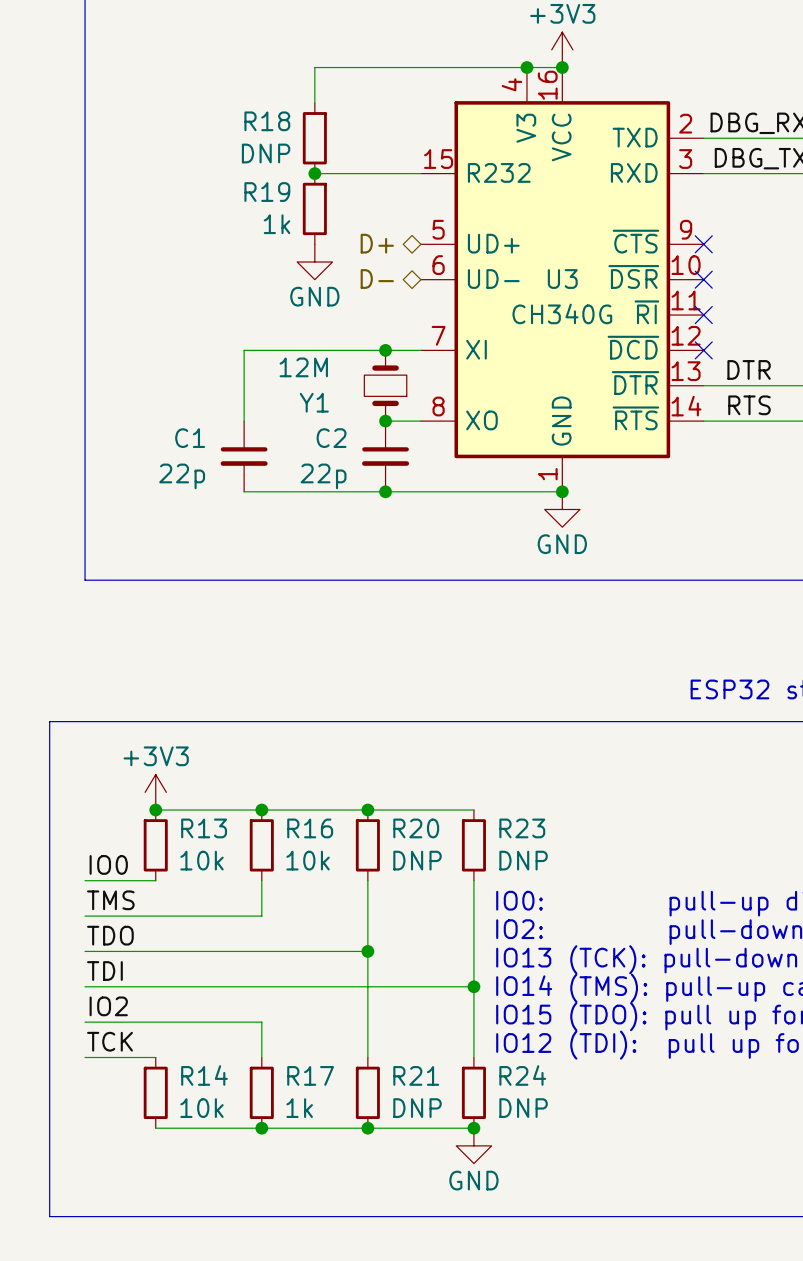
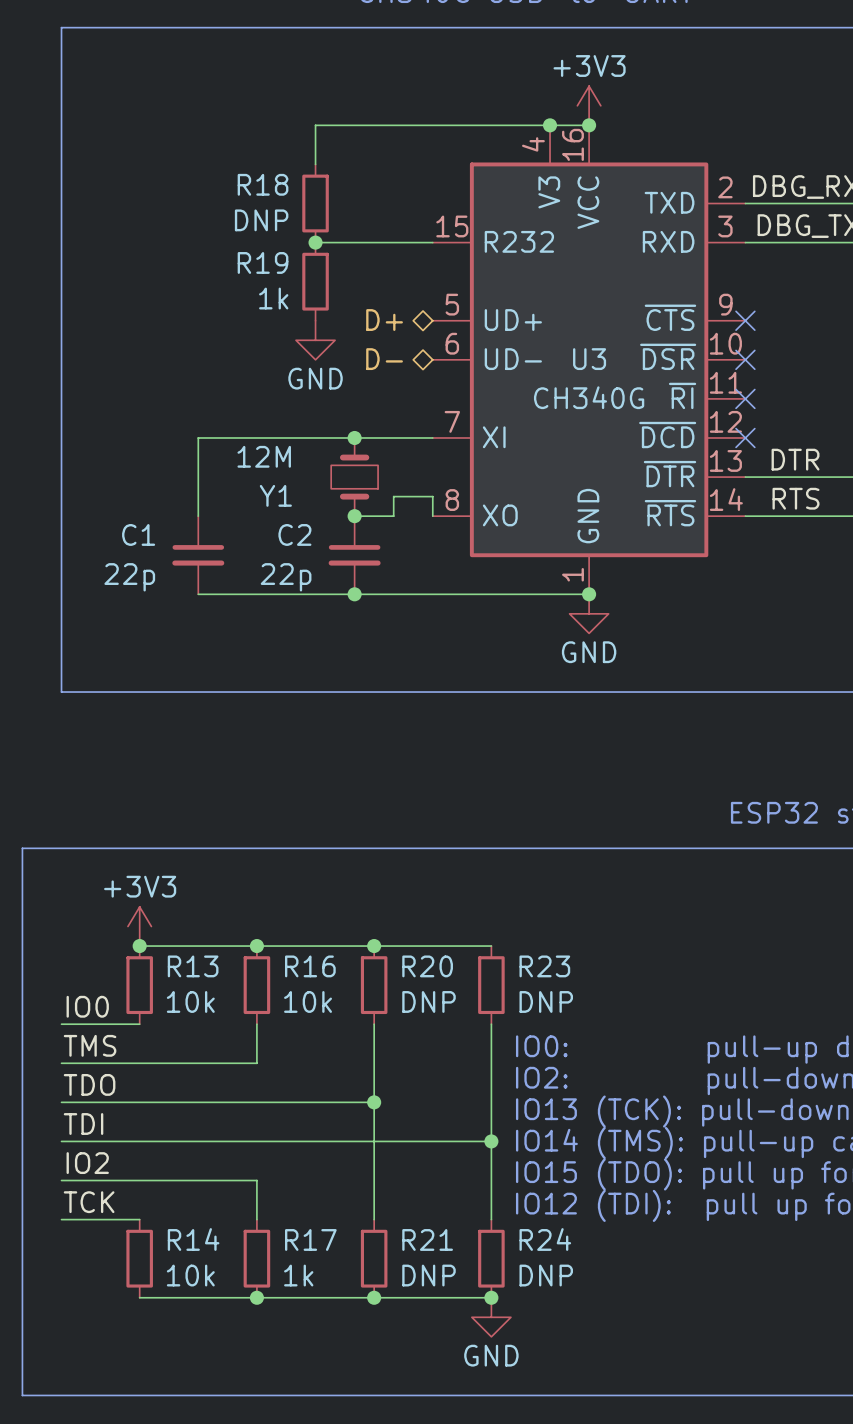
wire: (244, 350) (244, 421) -> (237, 437) (198, 437) (198, 516)
junction position: (385, 350) -> (354, 437)
Y1 position: (385, 385) -> (354, 477)
wire: (385, 421) (420, 421) -> (354, 516) (393, 516) (393, 496) (432, 496) (432, 516)
junction position: (385, 421) -> (354, 516)
C1 position: (244, 456) -> (198, 555)
C2 position: (385, 456) -> (354, 555)
wire: none -> (198, 594) (237, 594)
junction position: (385, 491) -> (354, 594)

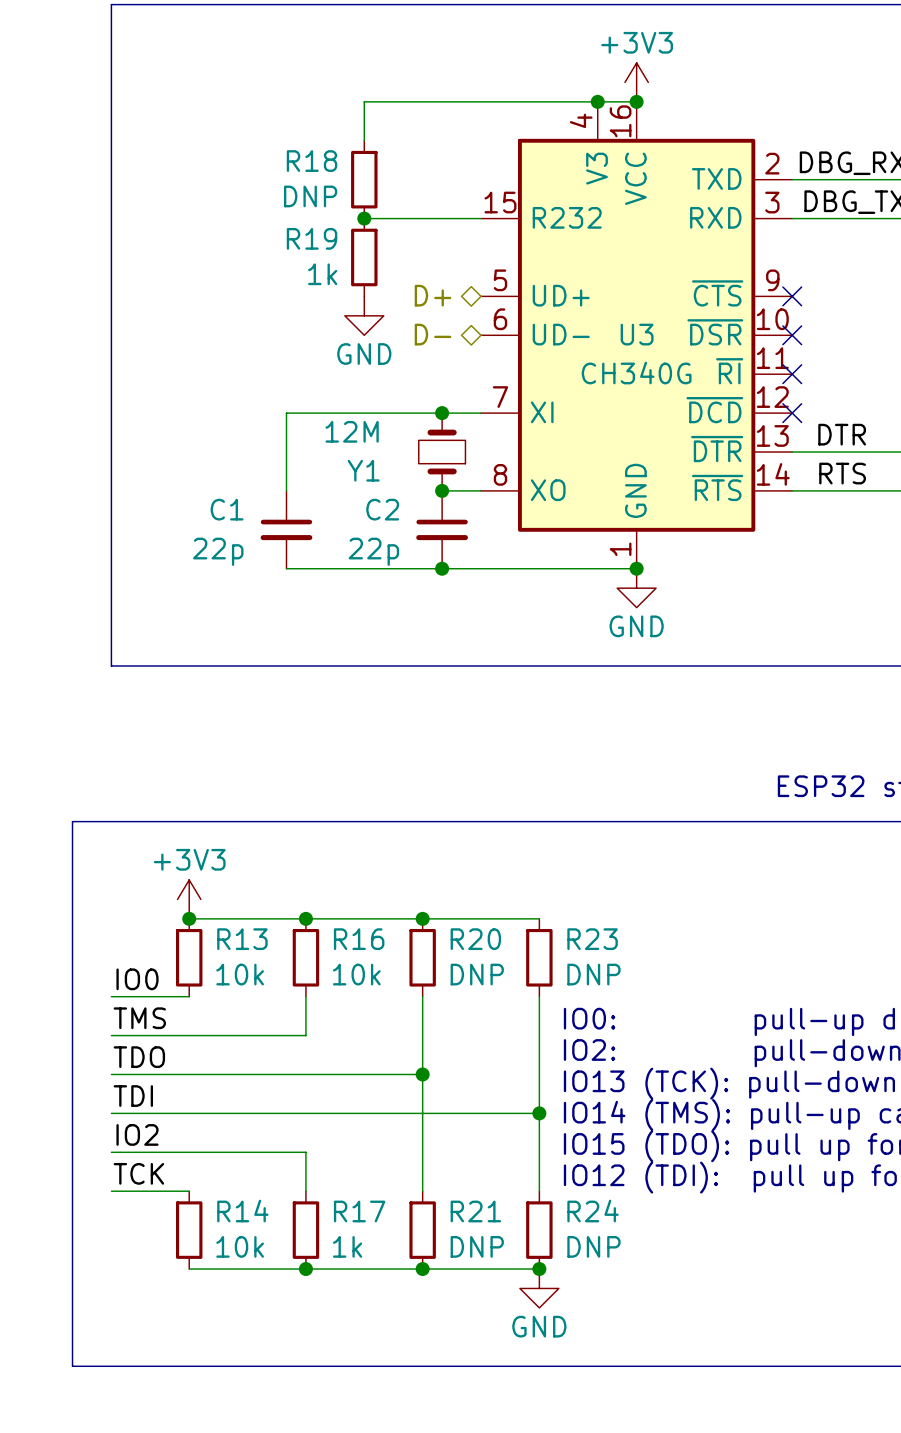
wire: (237, 437) (198, 437) (198, 516) -> (286, 413) (286, 490)
junction position: (354, 437) -> (442, 413)
Y1 position: (354, 477) -> (442, 452)
wire: (354, 516) (393, 516) (393, 496) (432, 496) (432, 516) -> (442, 490) (481, 490)
junction position: (354, 516) -> (442, 490)
C1 position: (198, 555) -> (286, 529)
C2 position: (354, 555) -> (442, 529)
wire: (198, 594) (237, 594) -> none
junction position: (354, 594) -> (442, 568)

